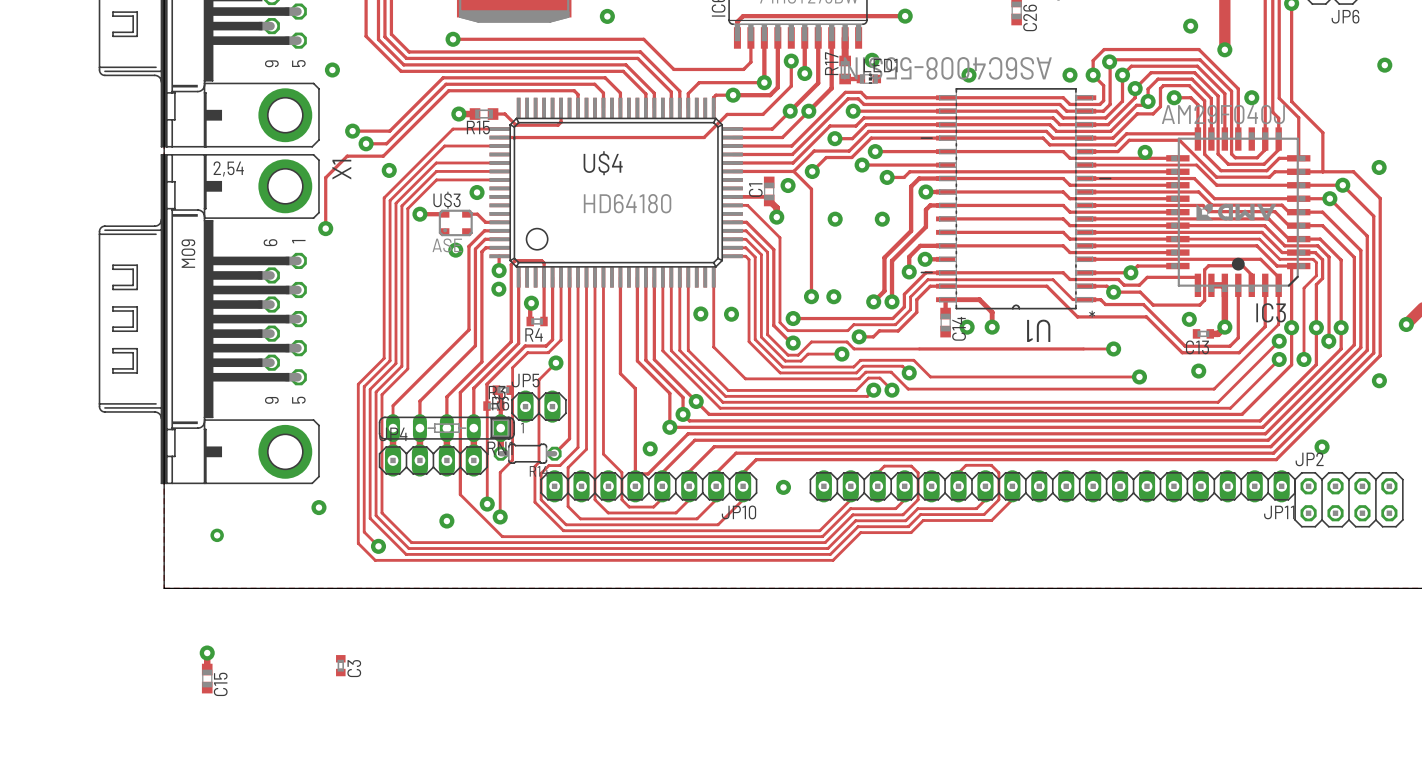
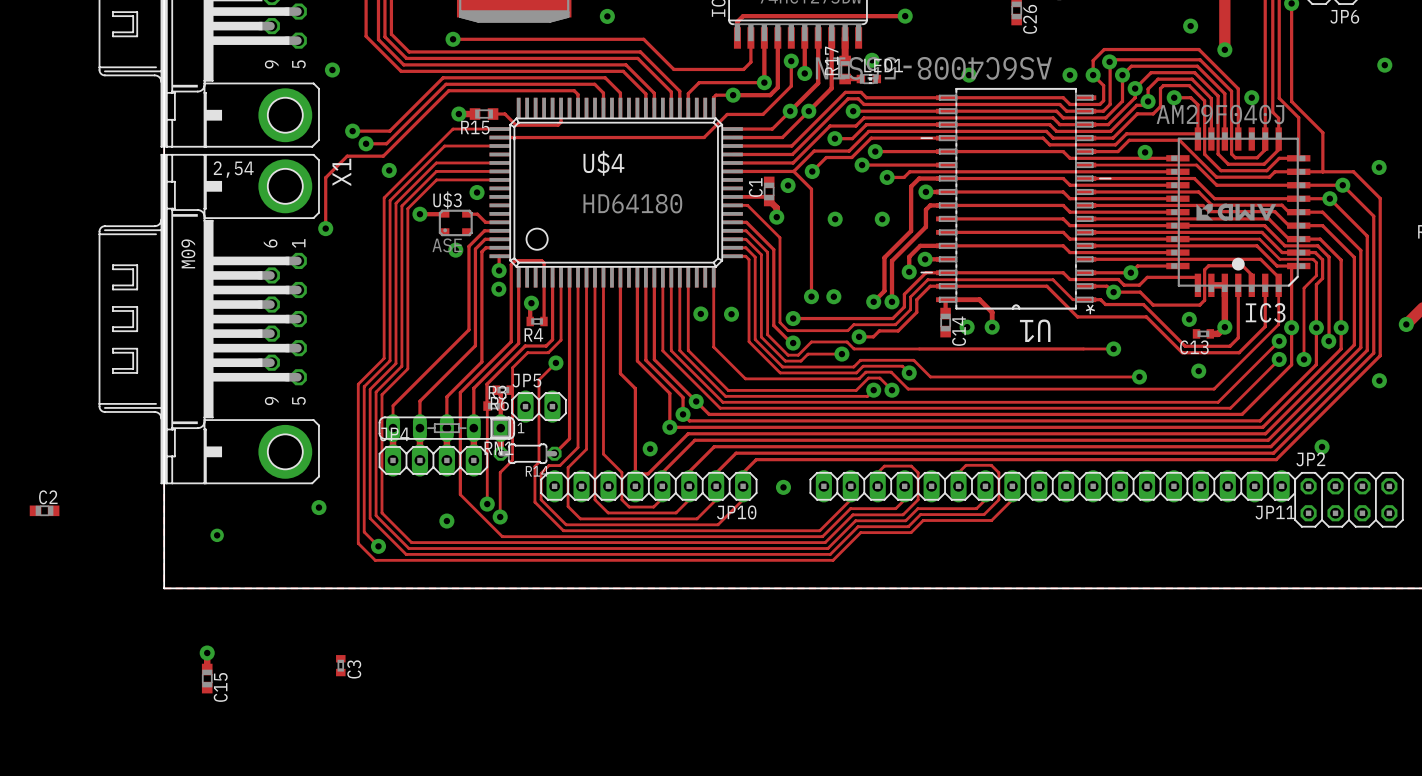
C2: none -> (44, 510)

